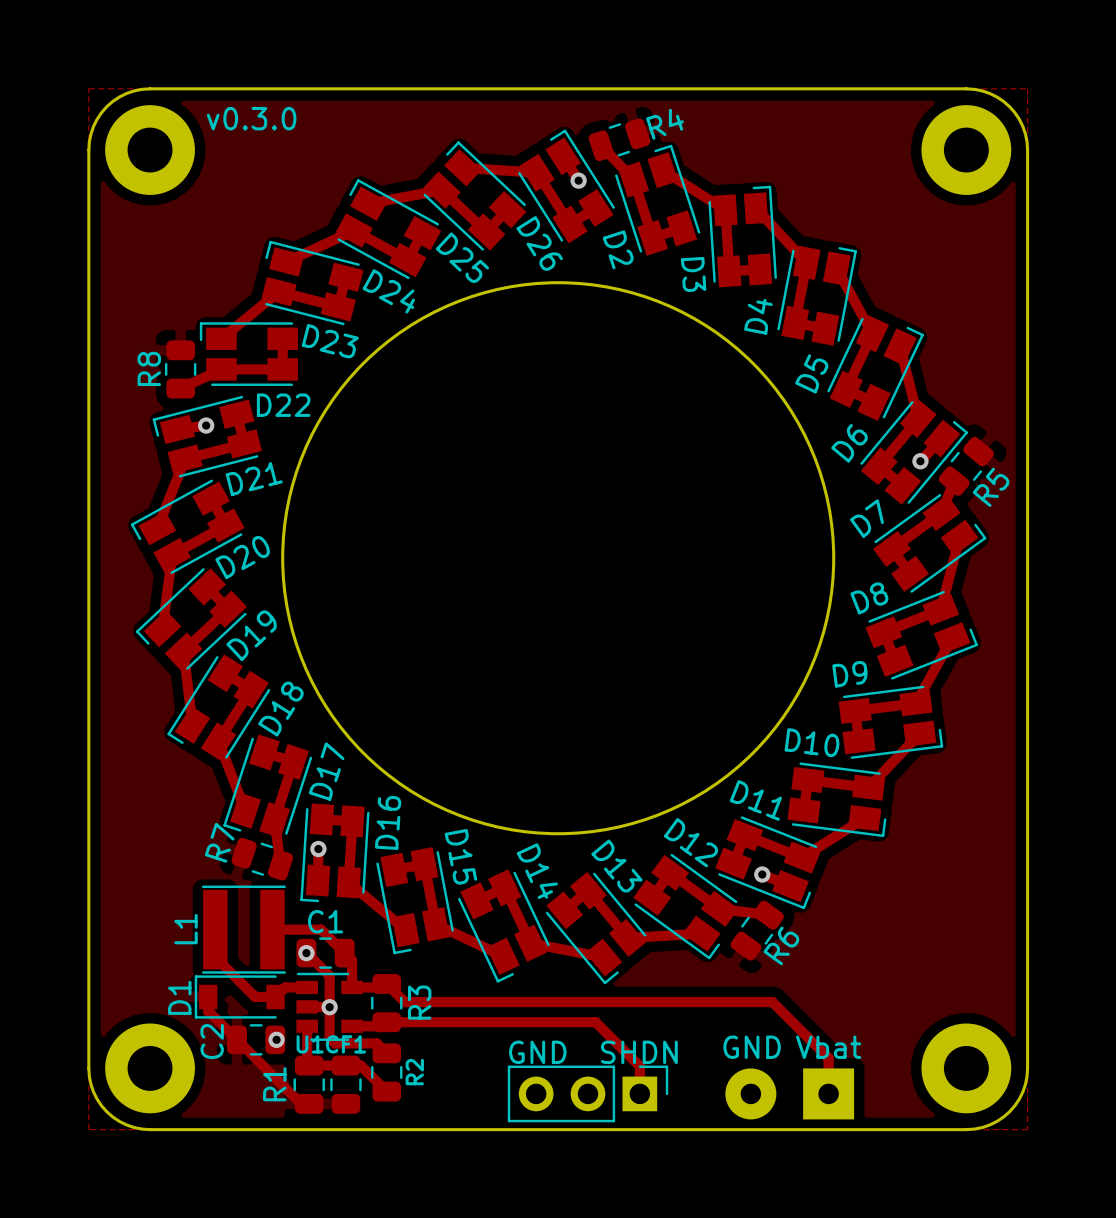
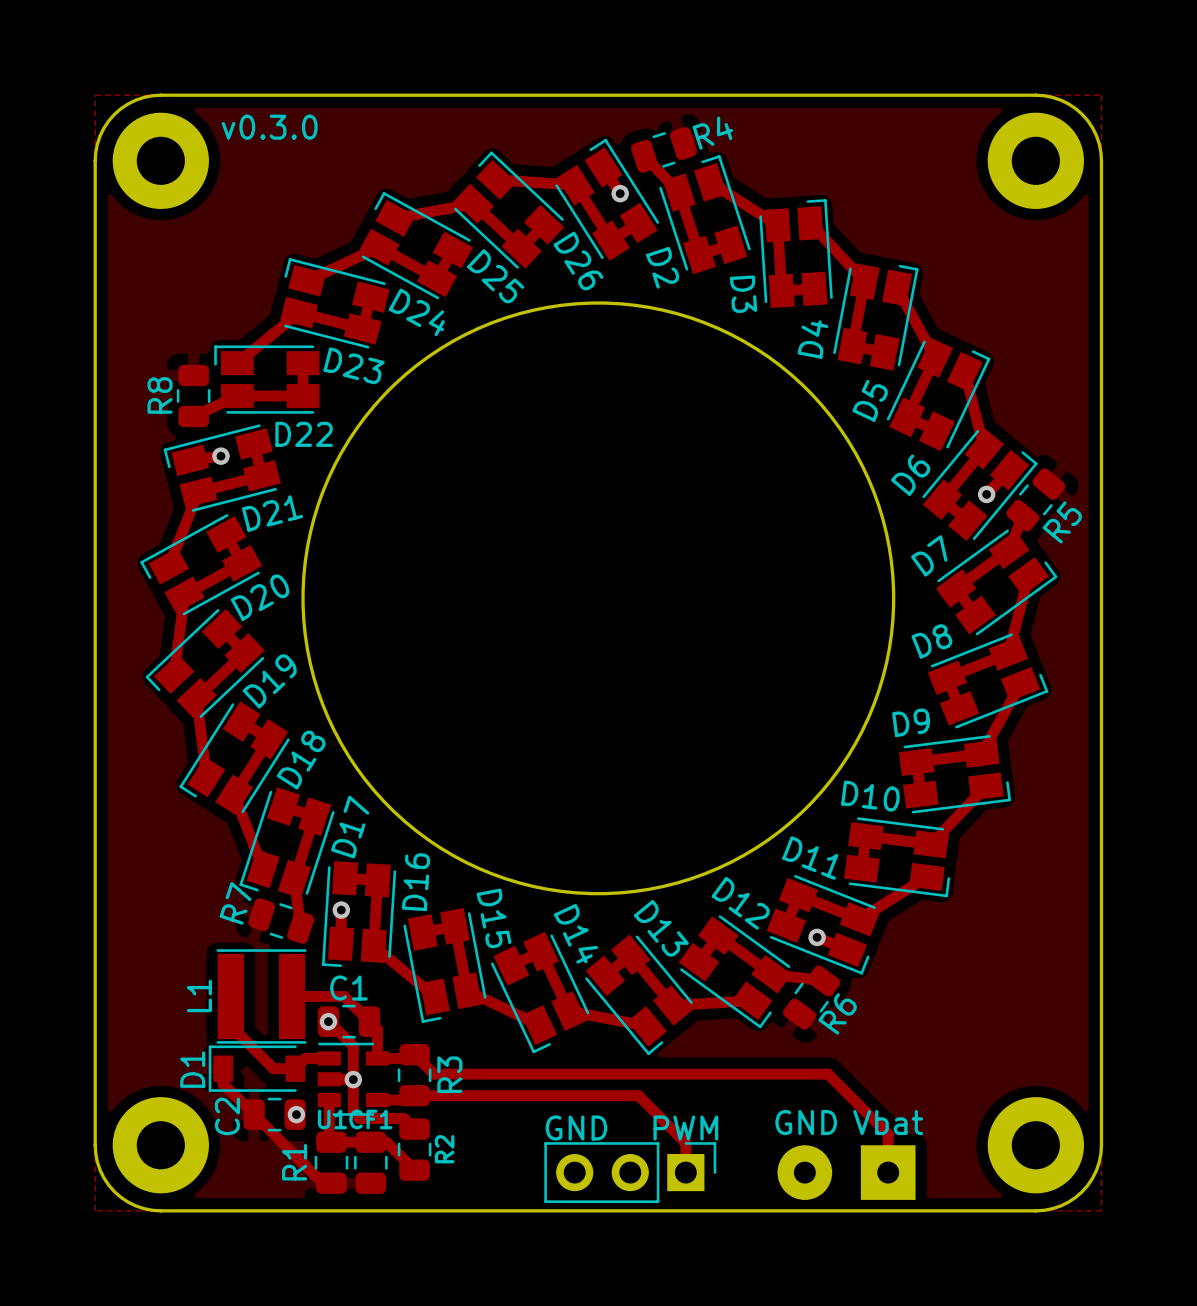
text: SHDN (639, 1052) -> PWM (685, 1128)

